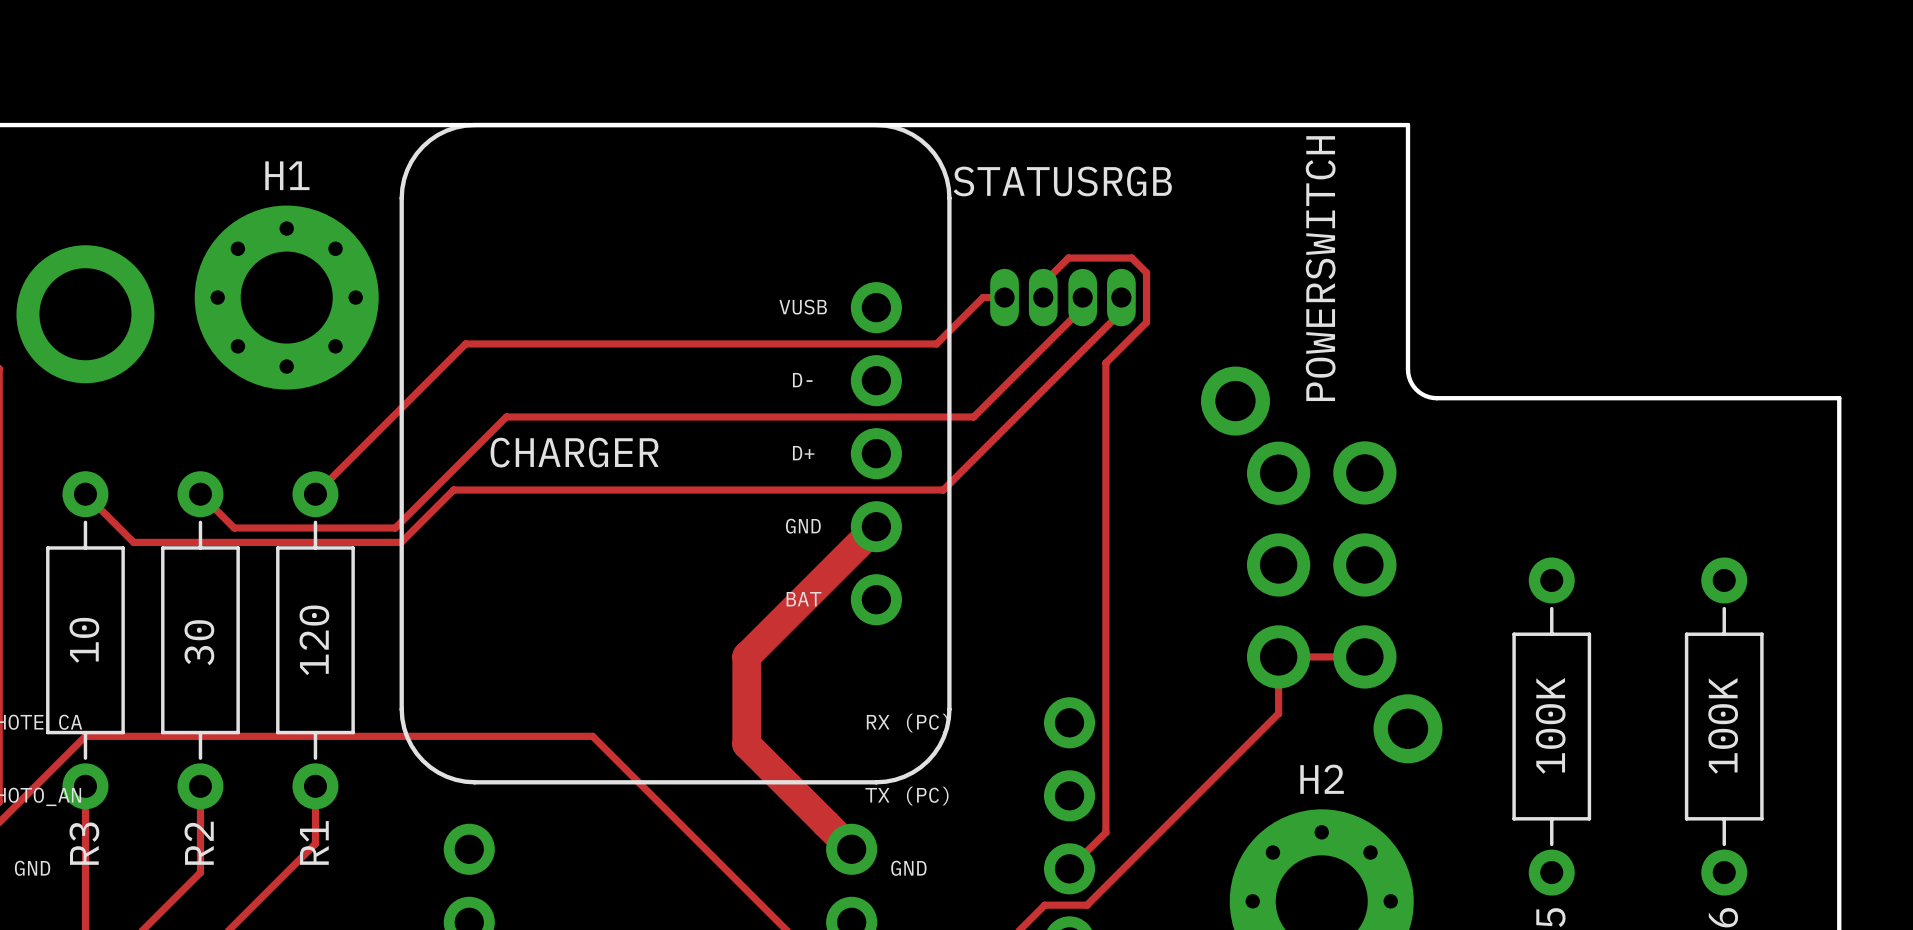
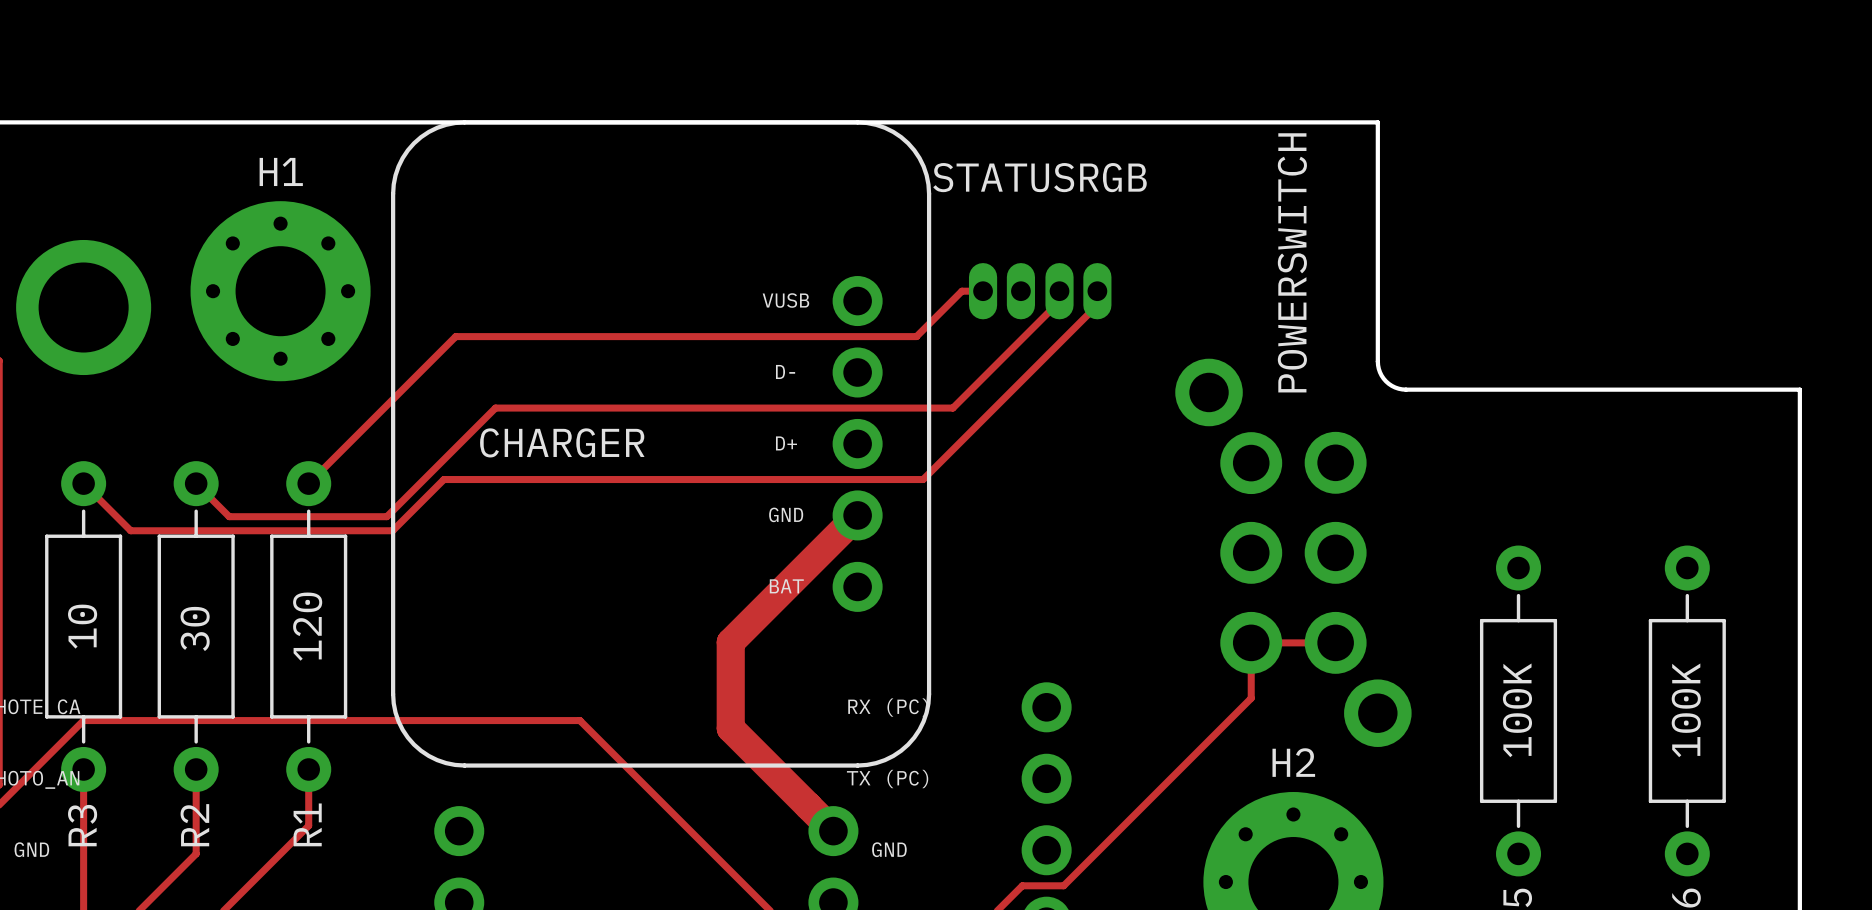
track: (1043, 297) (1043, 283) (1068, 258) (1131, 258) (1146, 272) (1146, 322) (1105, 363) (1105, 832) (1069, 868) -> none

